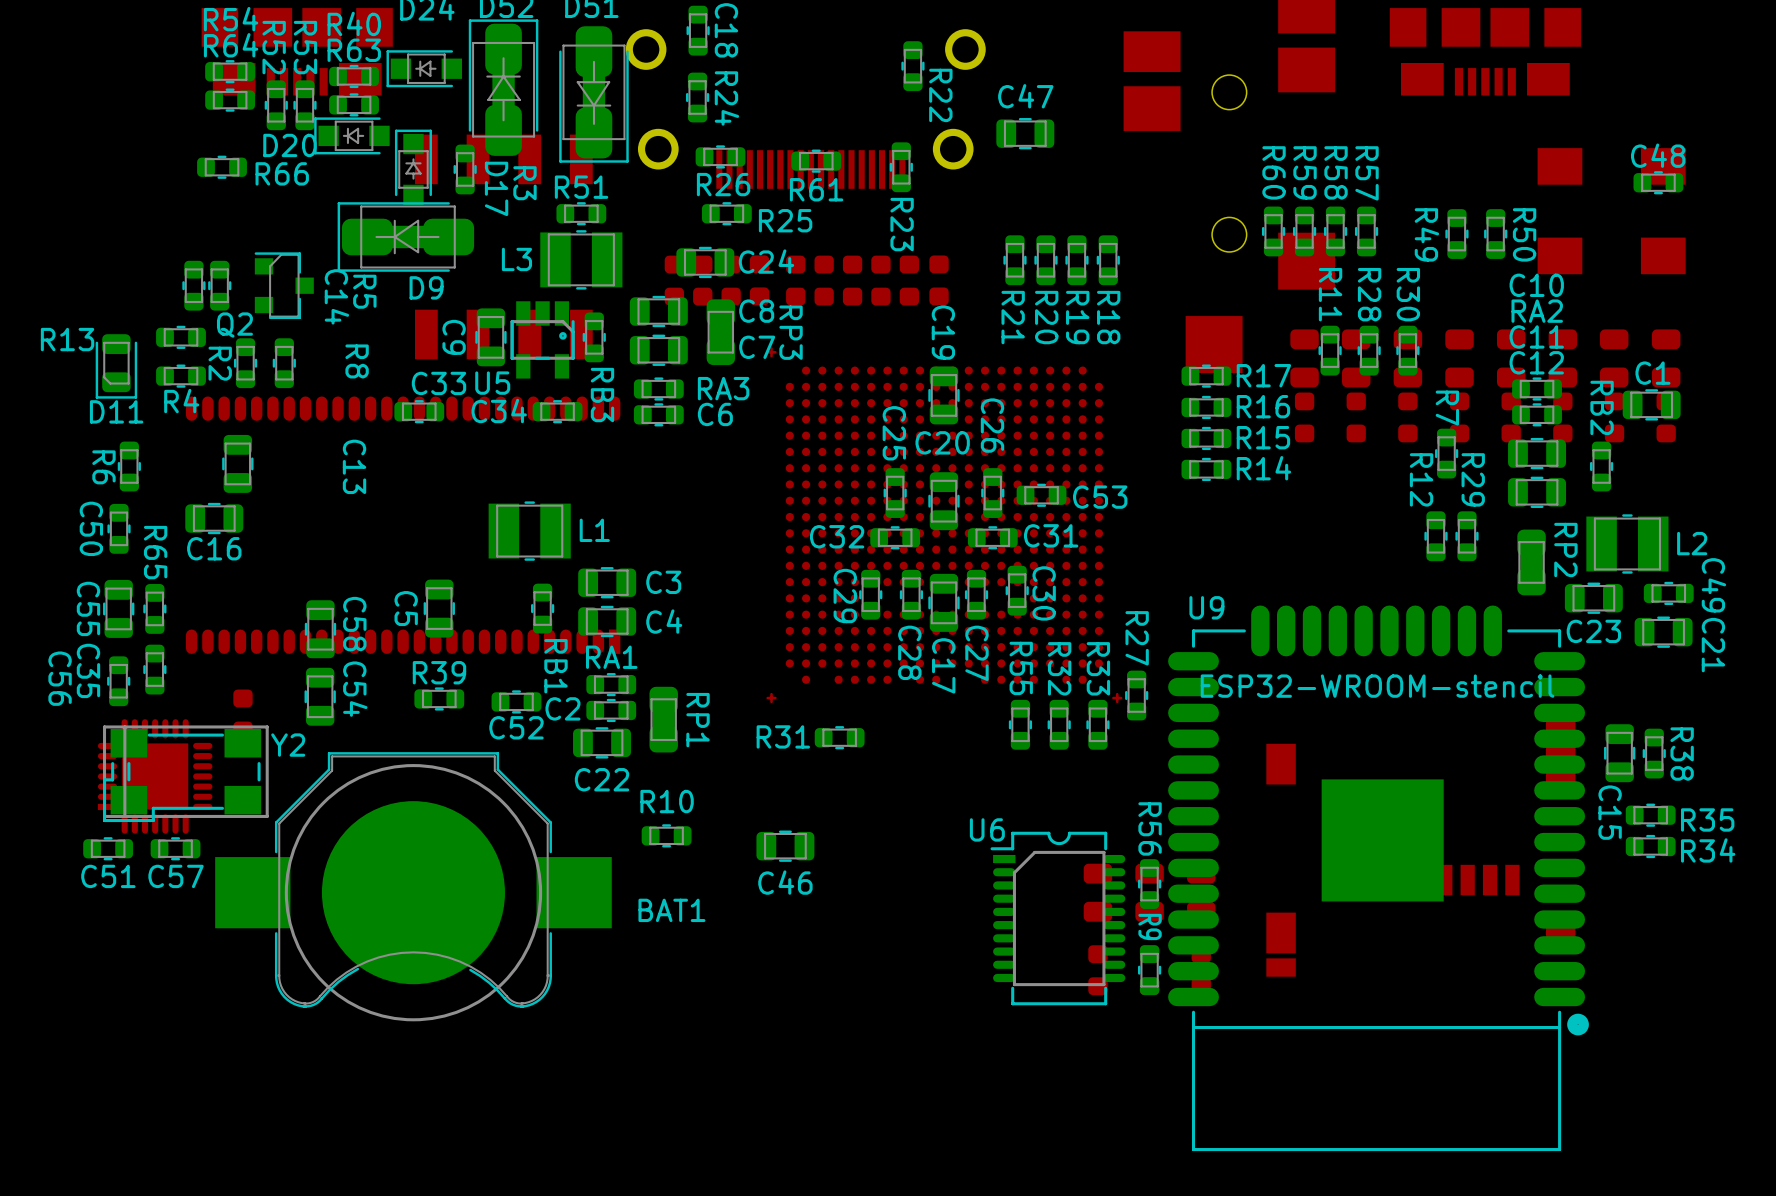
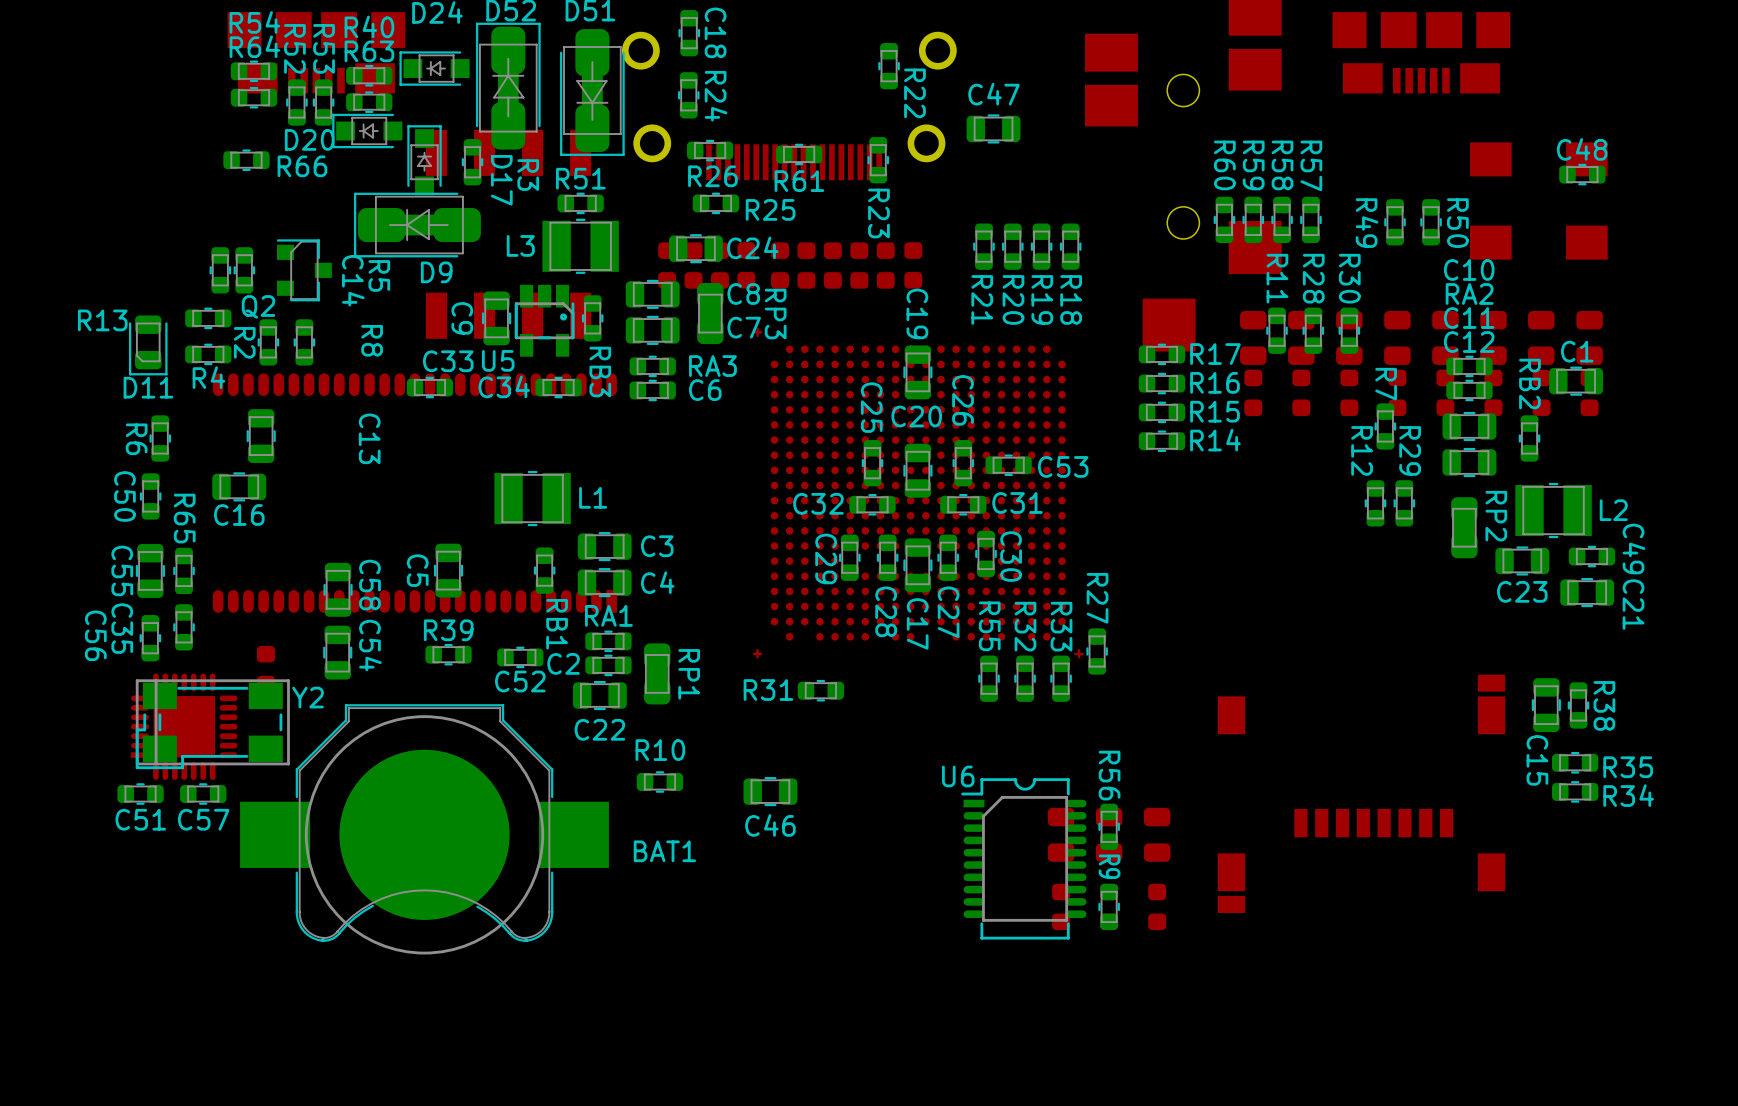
U9: (1378, 878) -> none

